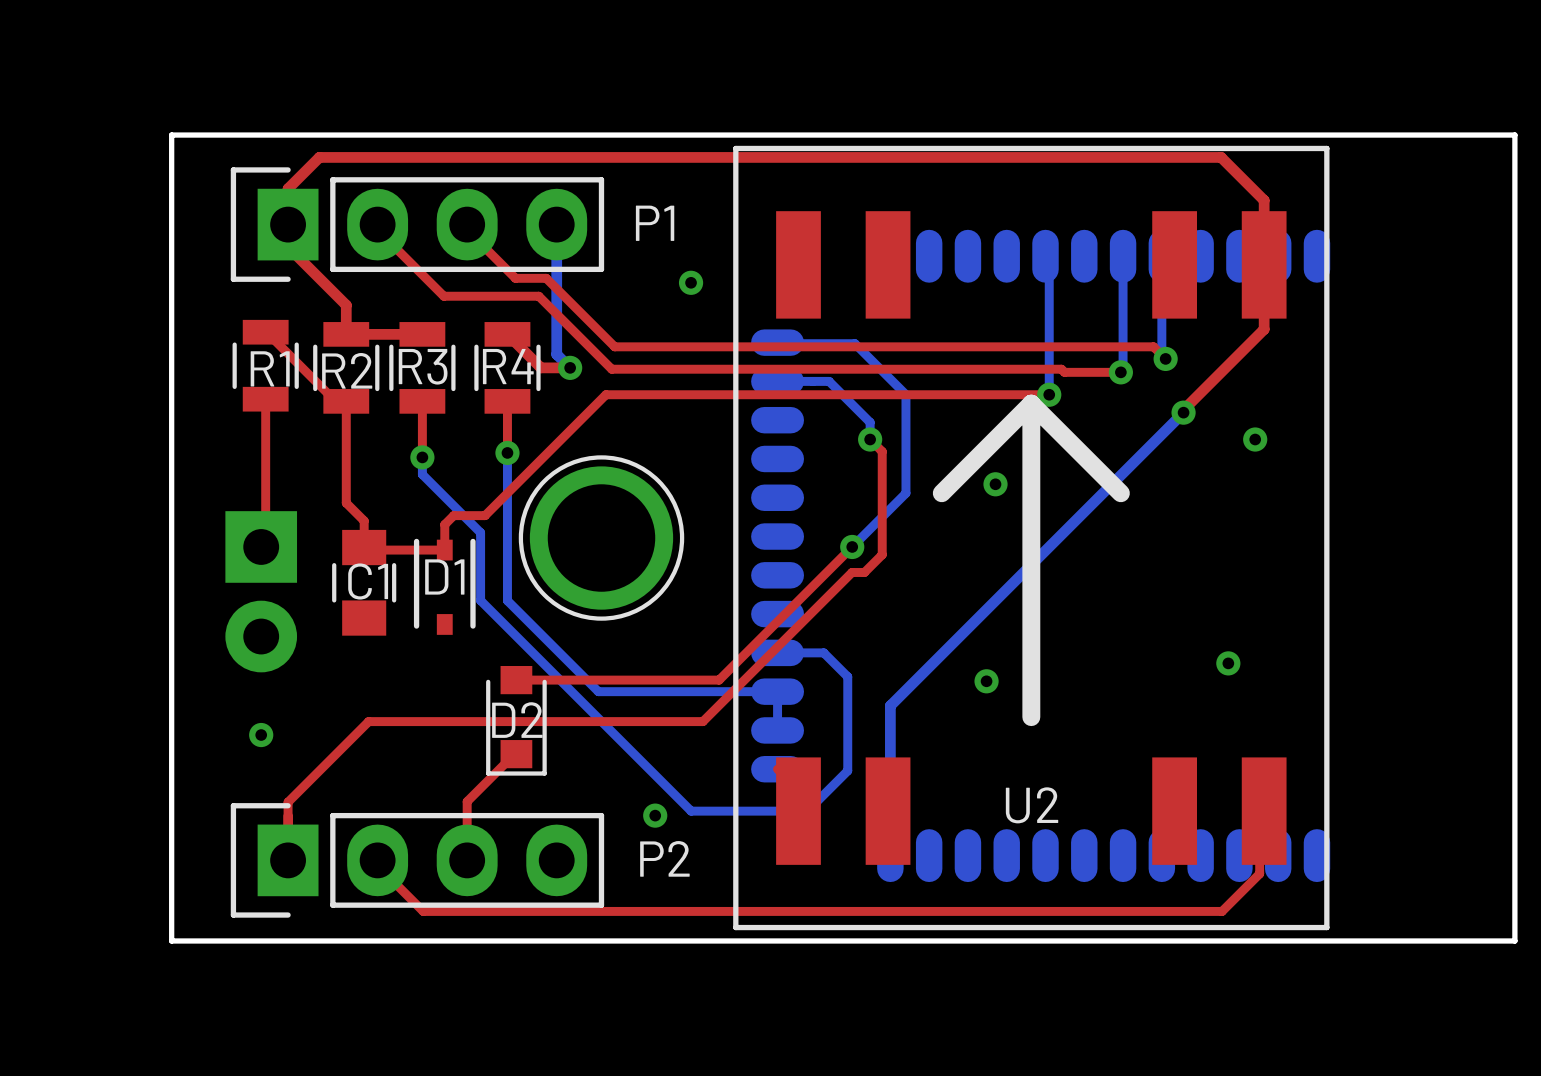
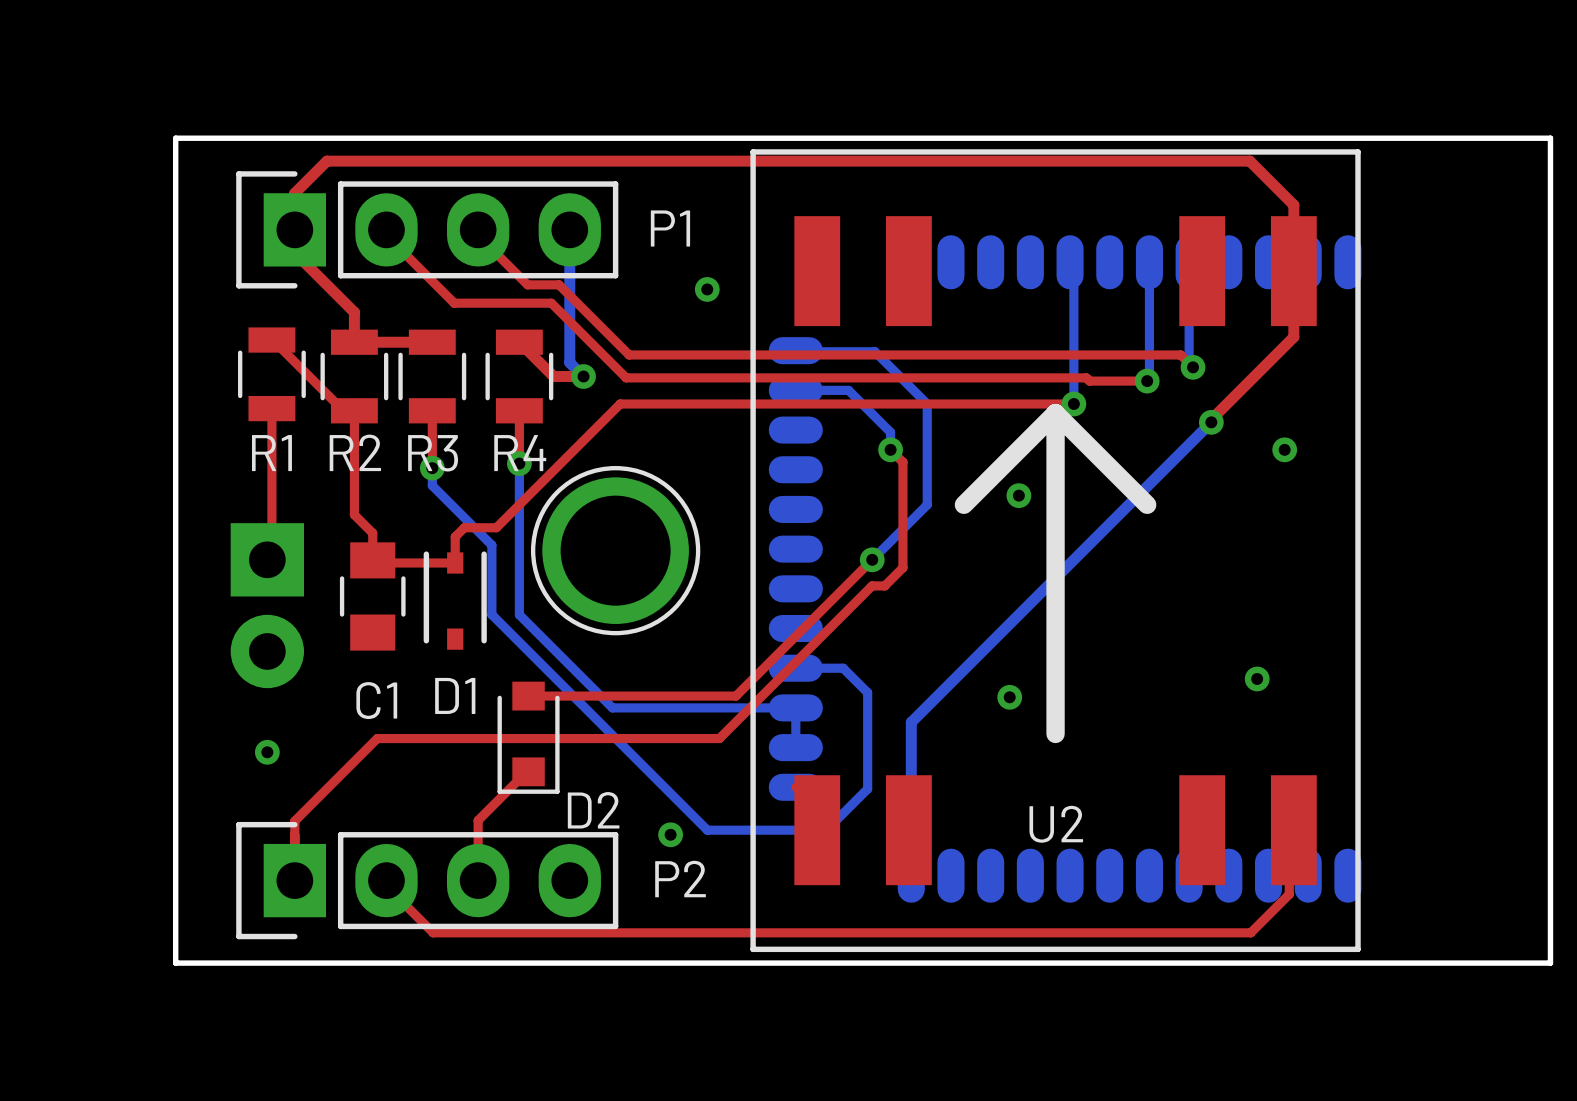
R3 name position: R3 (423, 366) -> R3 (433, 453)
R4 name position: R4 (508, 366) -> R4 (520, 453)
R1 name position: R1 (270, 368) -> R1 (271, 453)
R2 name position: R2 (347, 370) -> R2 (355, 452)
D1 name position: D1 (444, 576) -> D1 (455, 695)
C1 name position: C1 (368, 581) -> C1 (376, 700)
D2 name position: D2 (517, 720) -> D2 (593, 810)

